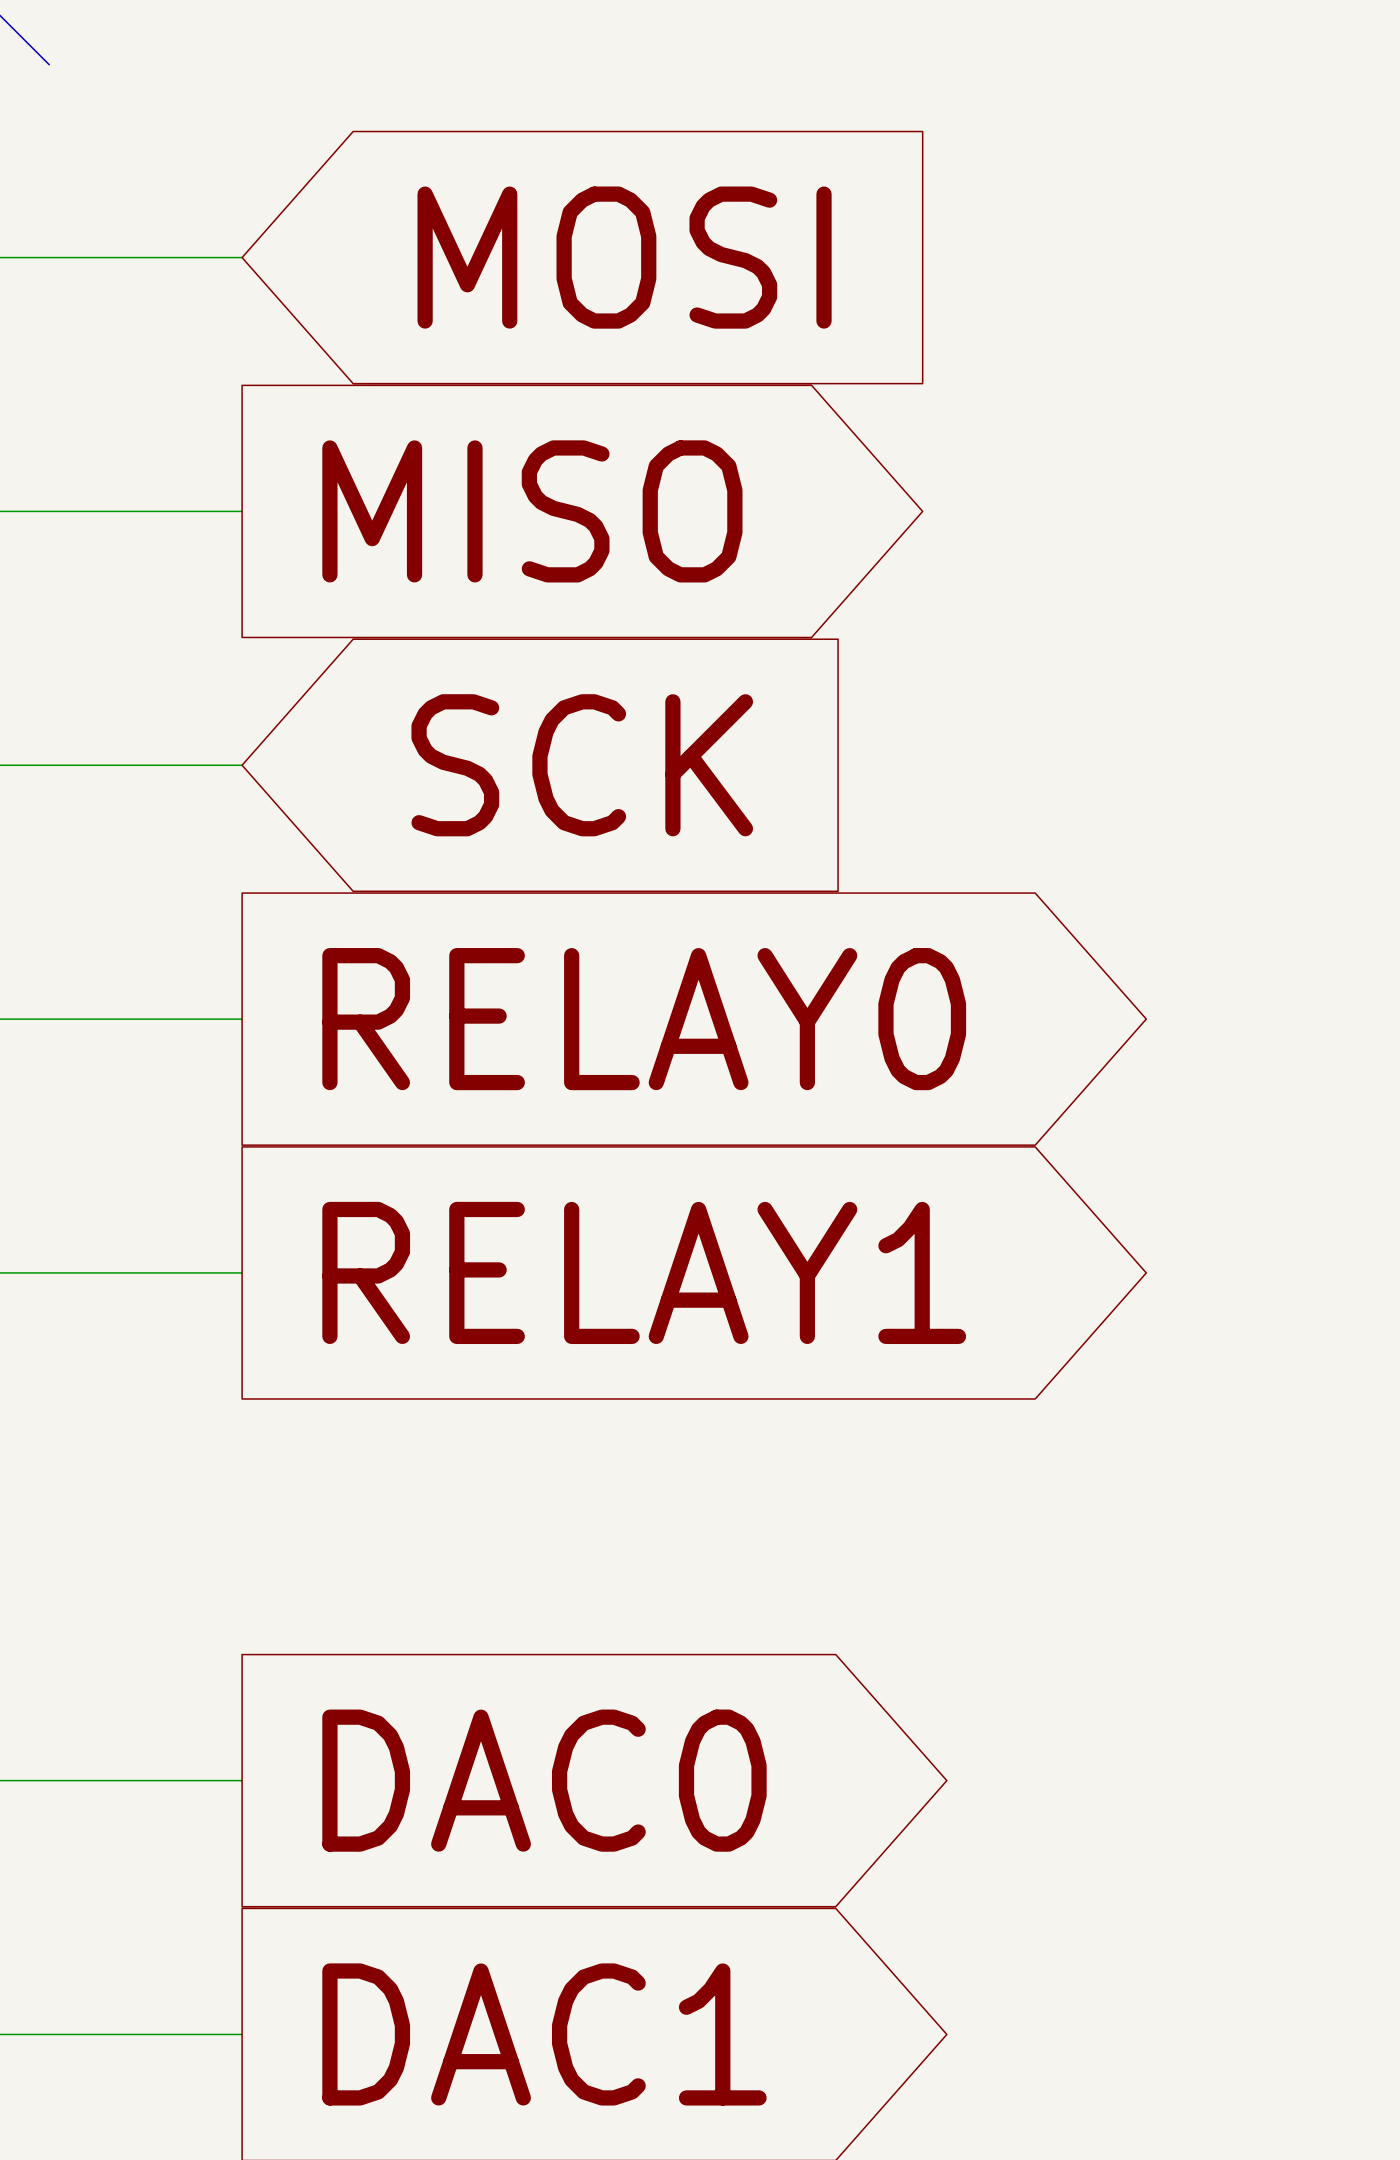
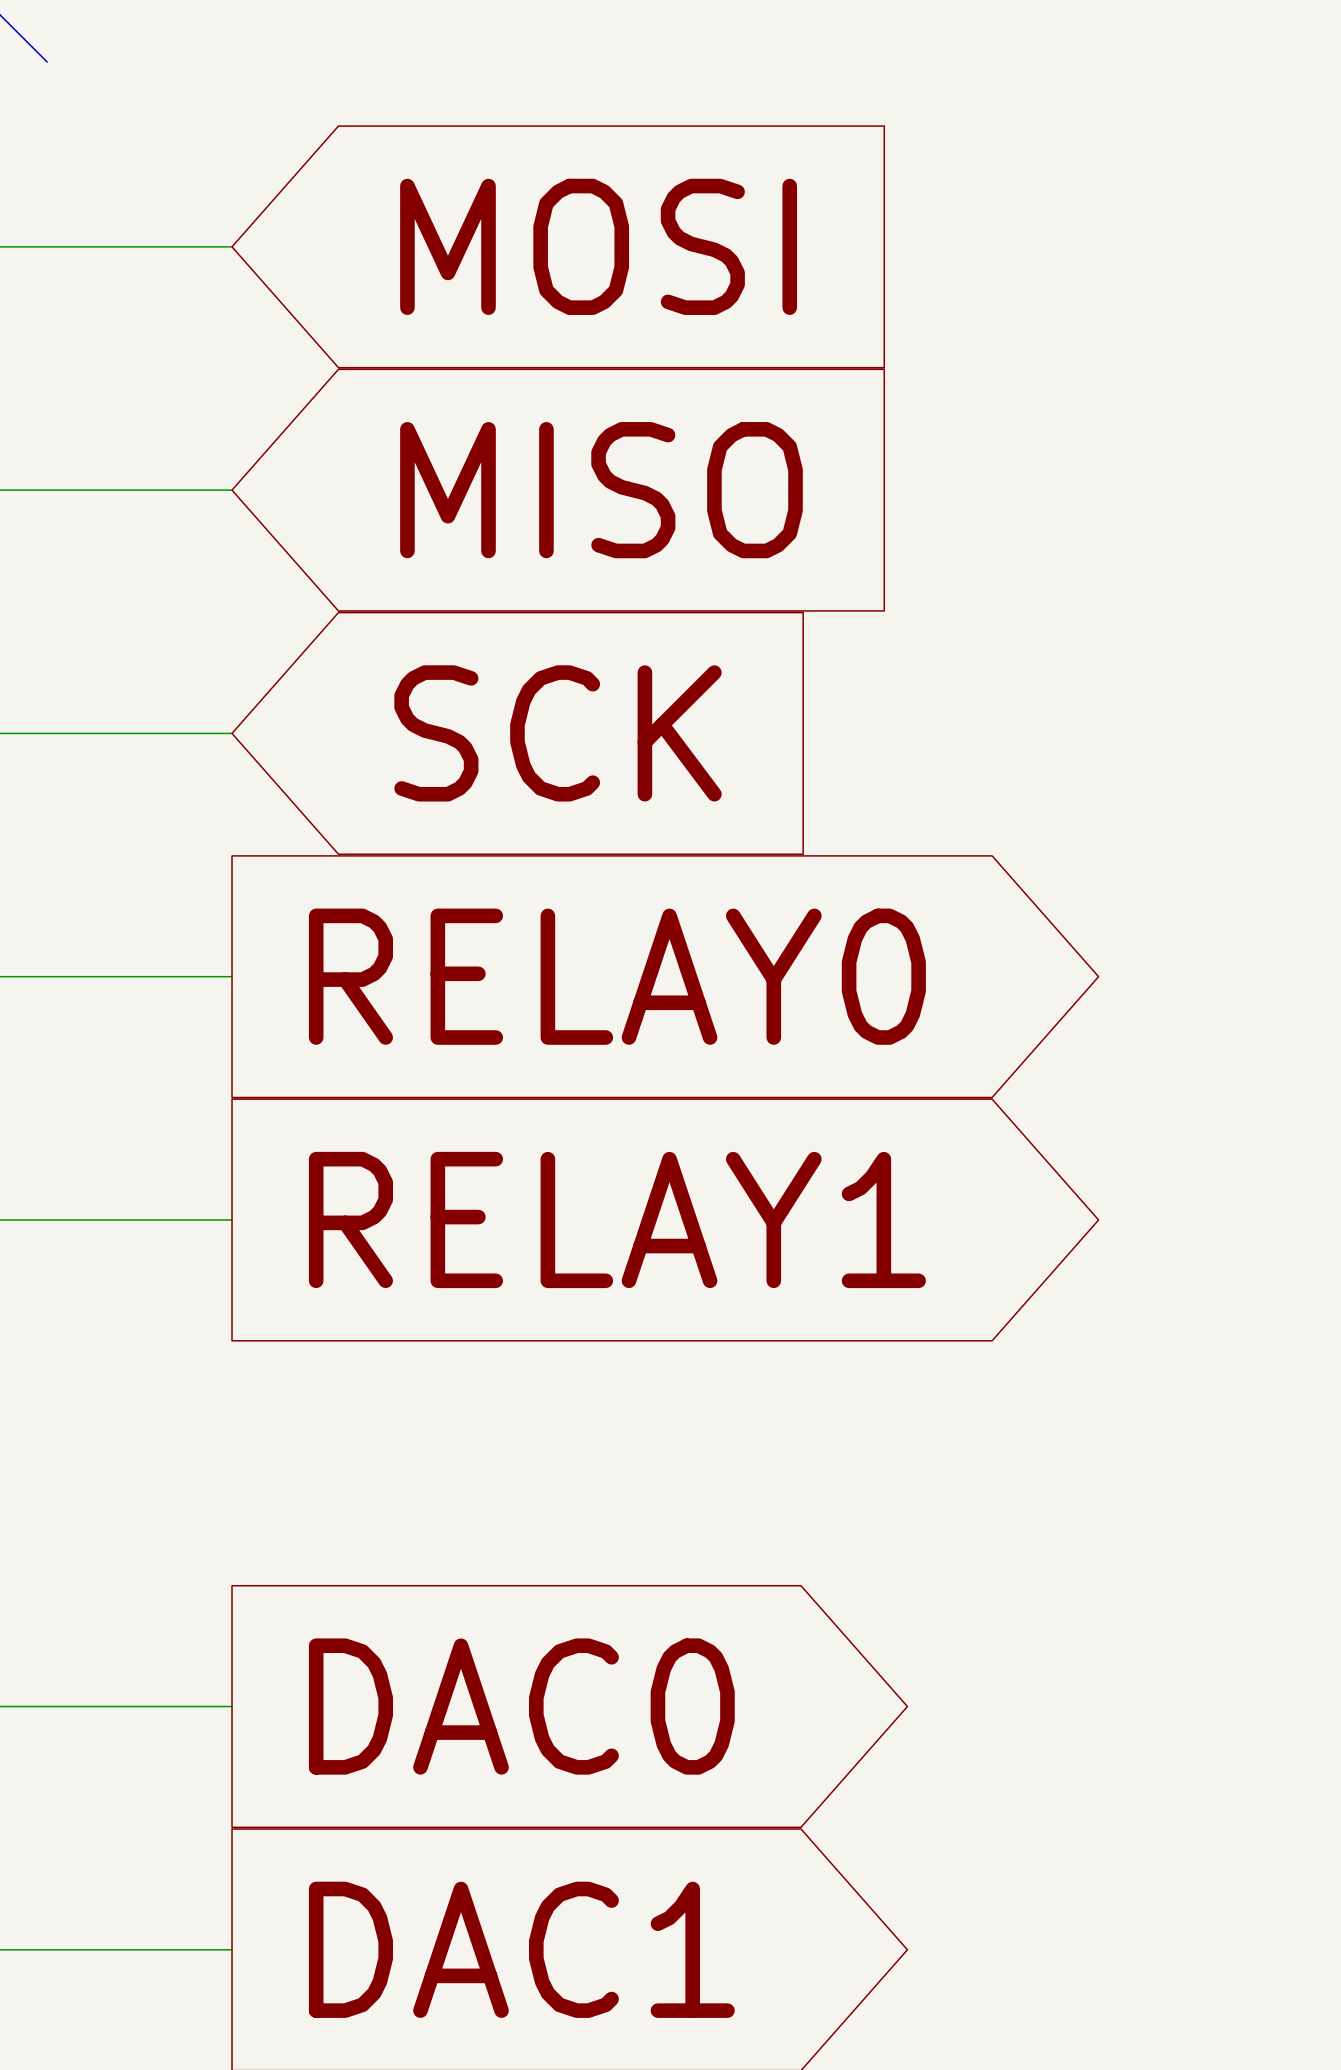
global label shape: output (532, 511) -> input (601, 490)

